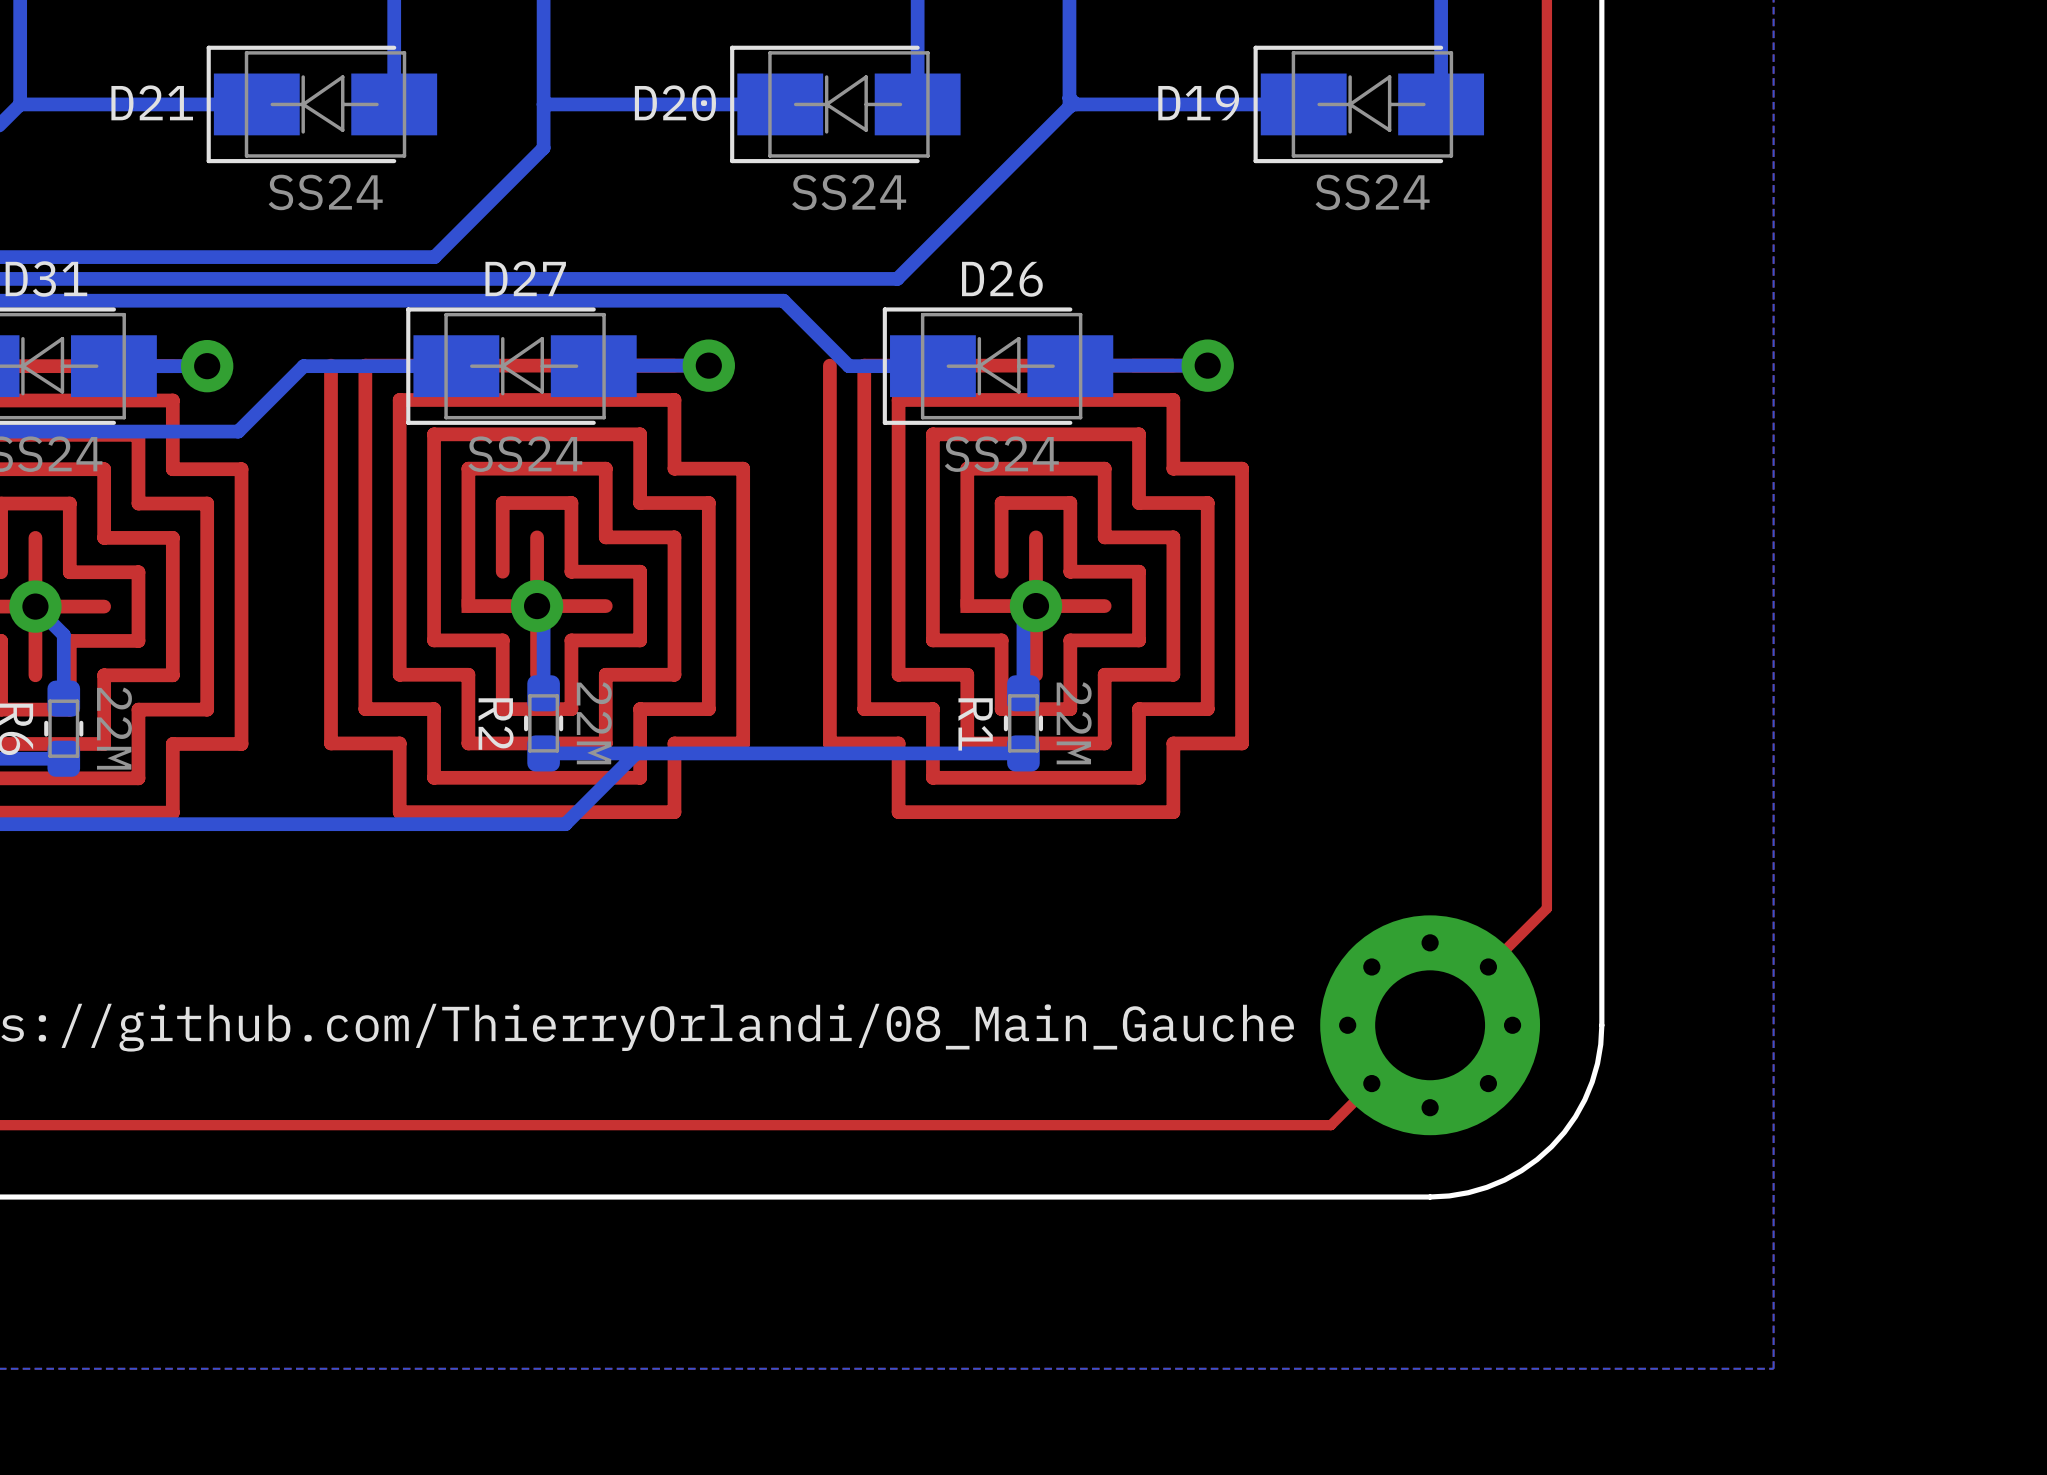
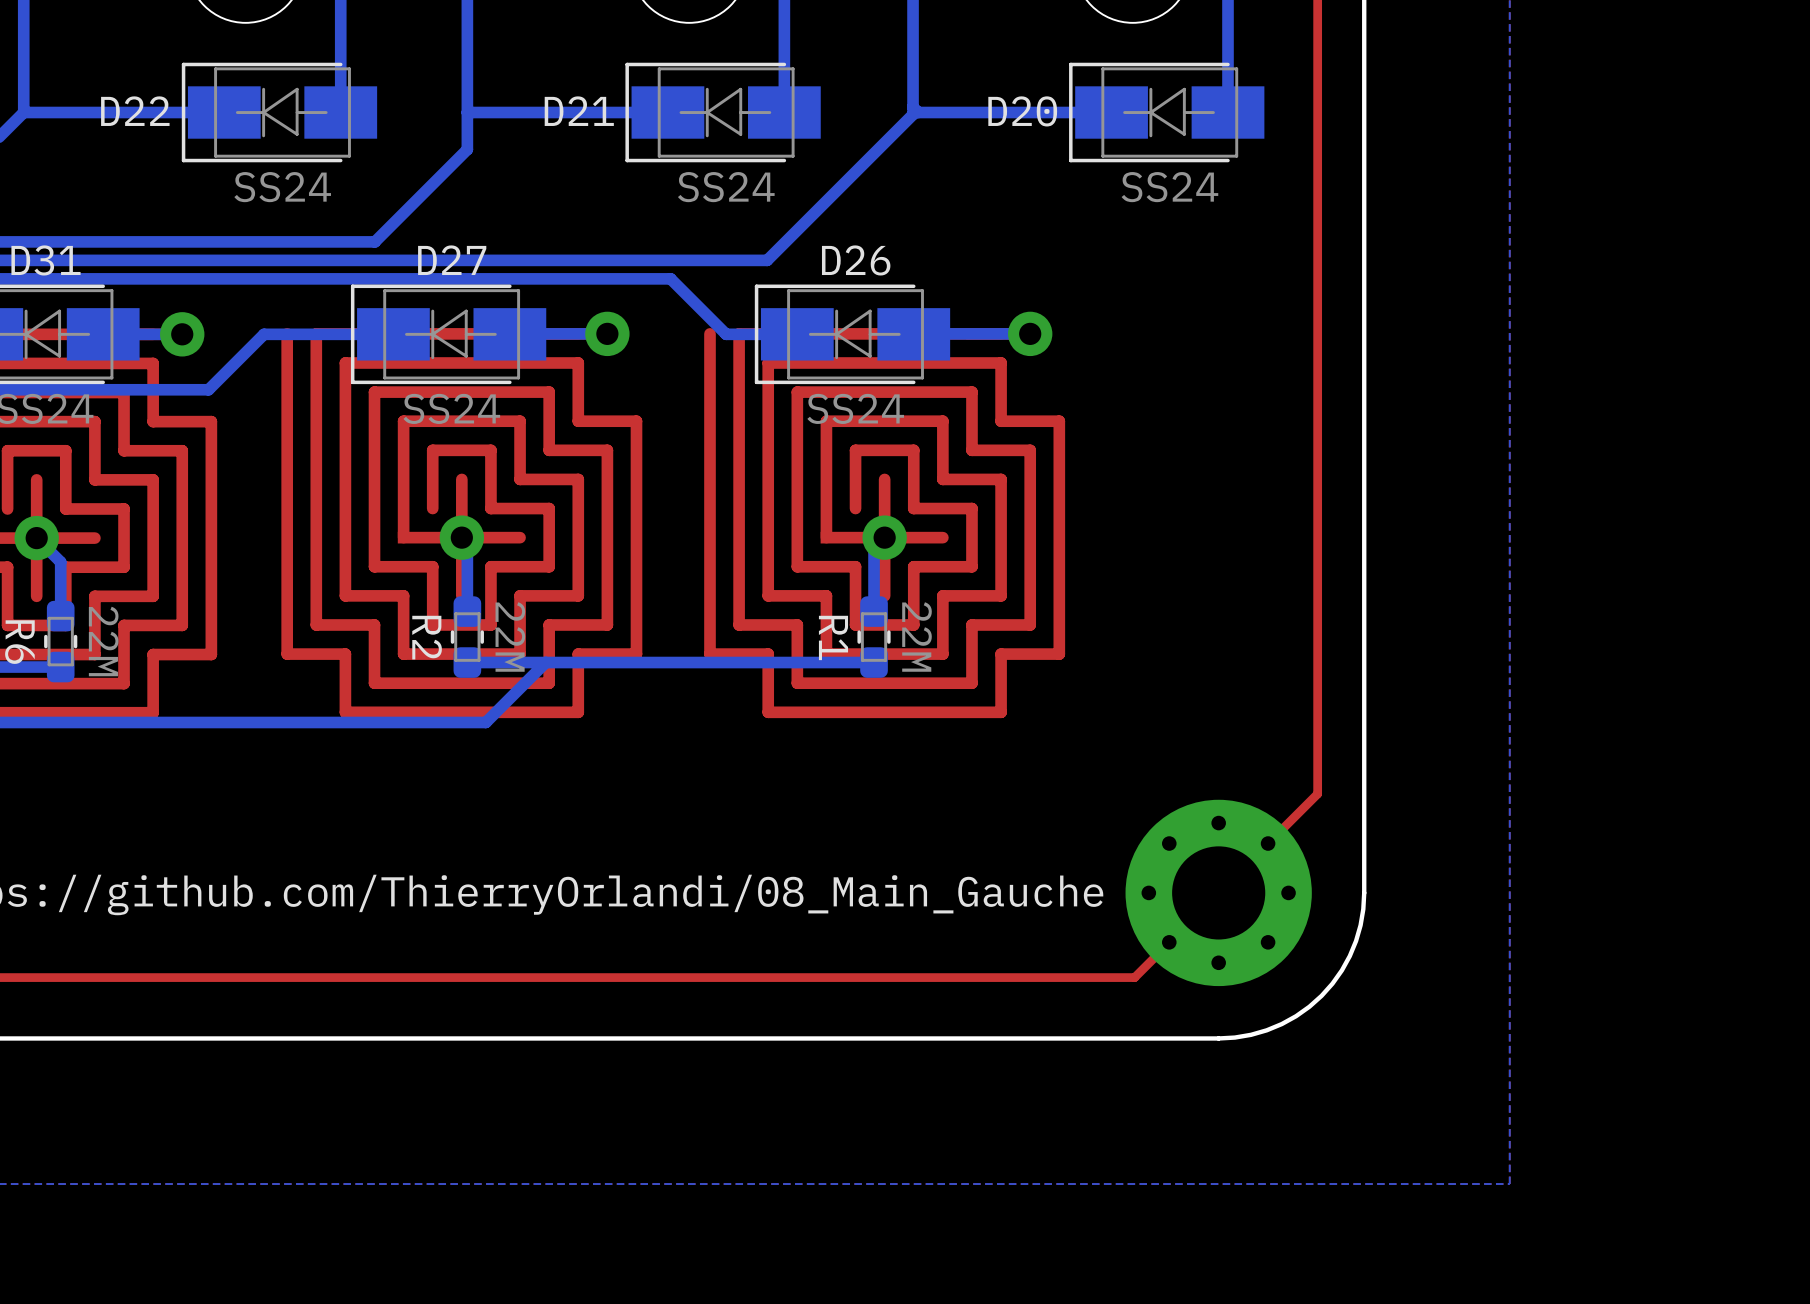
D21 name: D21 (152, 102) -> D22 (135, 111)
D19 name: D19 (1198, 102) -> D20 (1022, 111)
D20 name: D20 (675, 103) -> D21 (579, 111)

